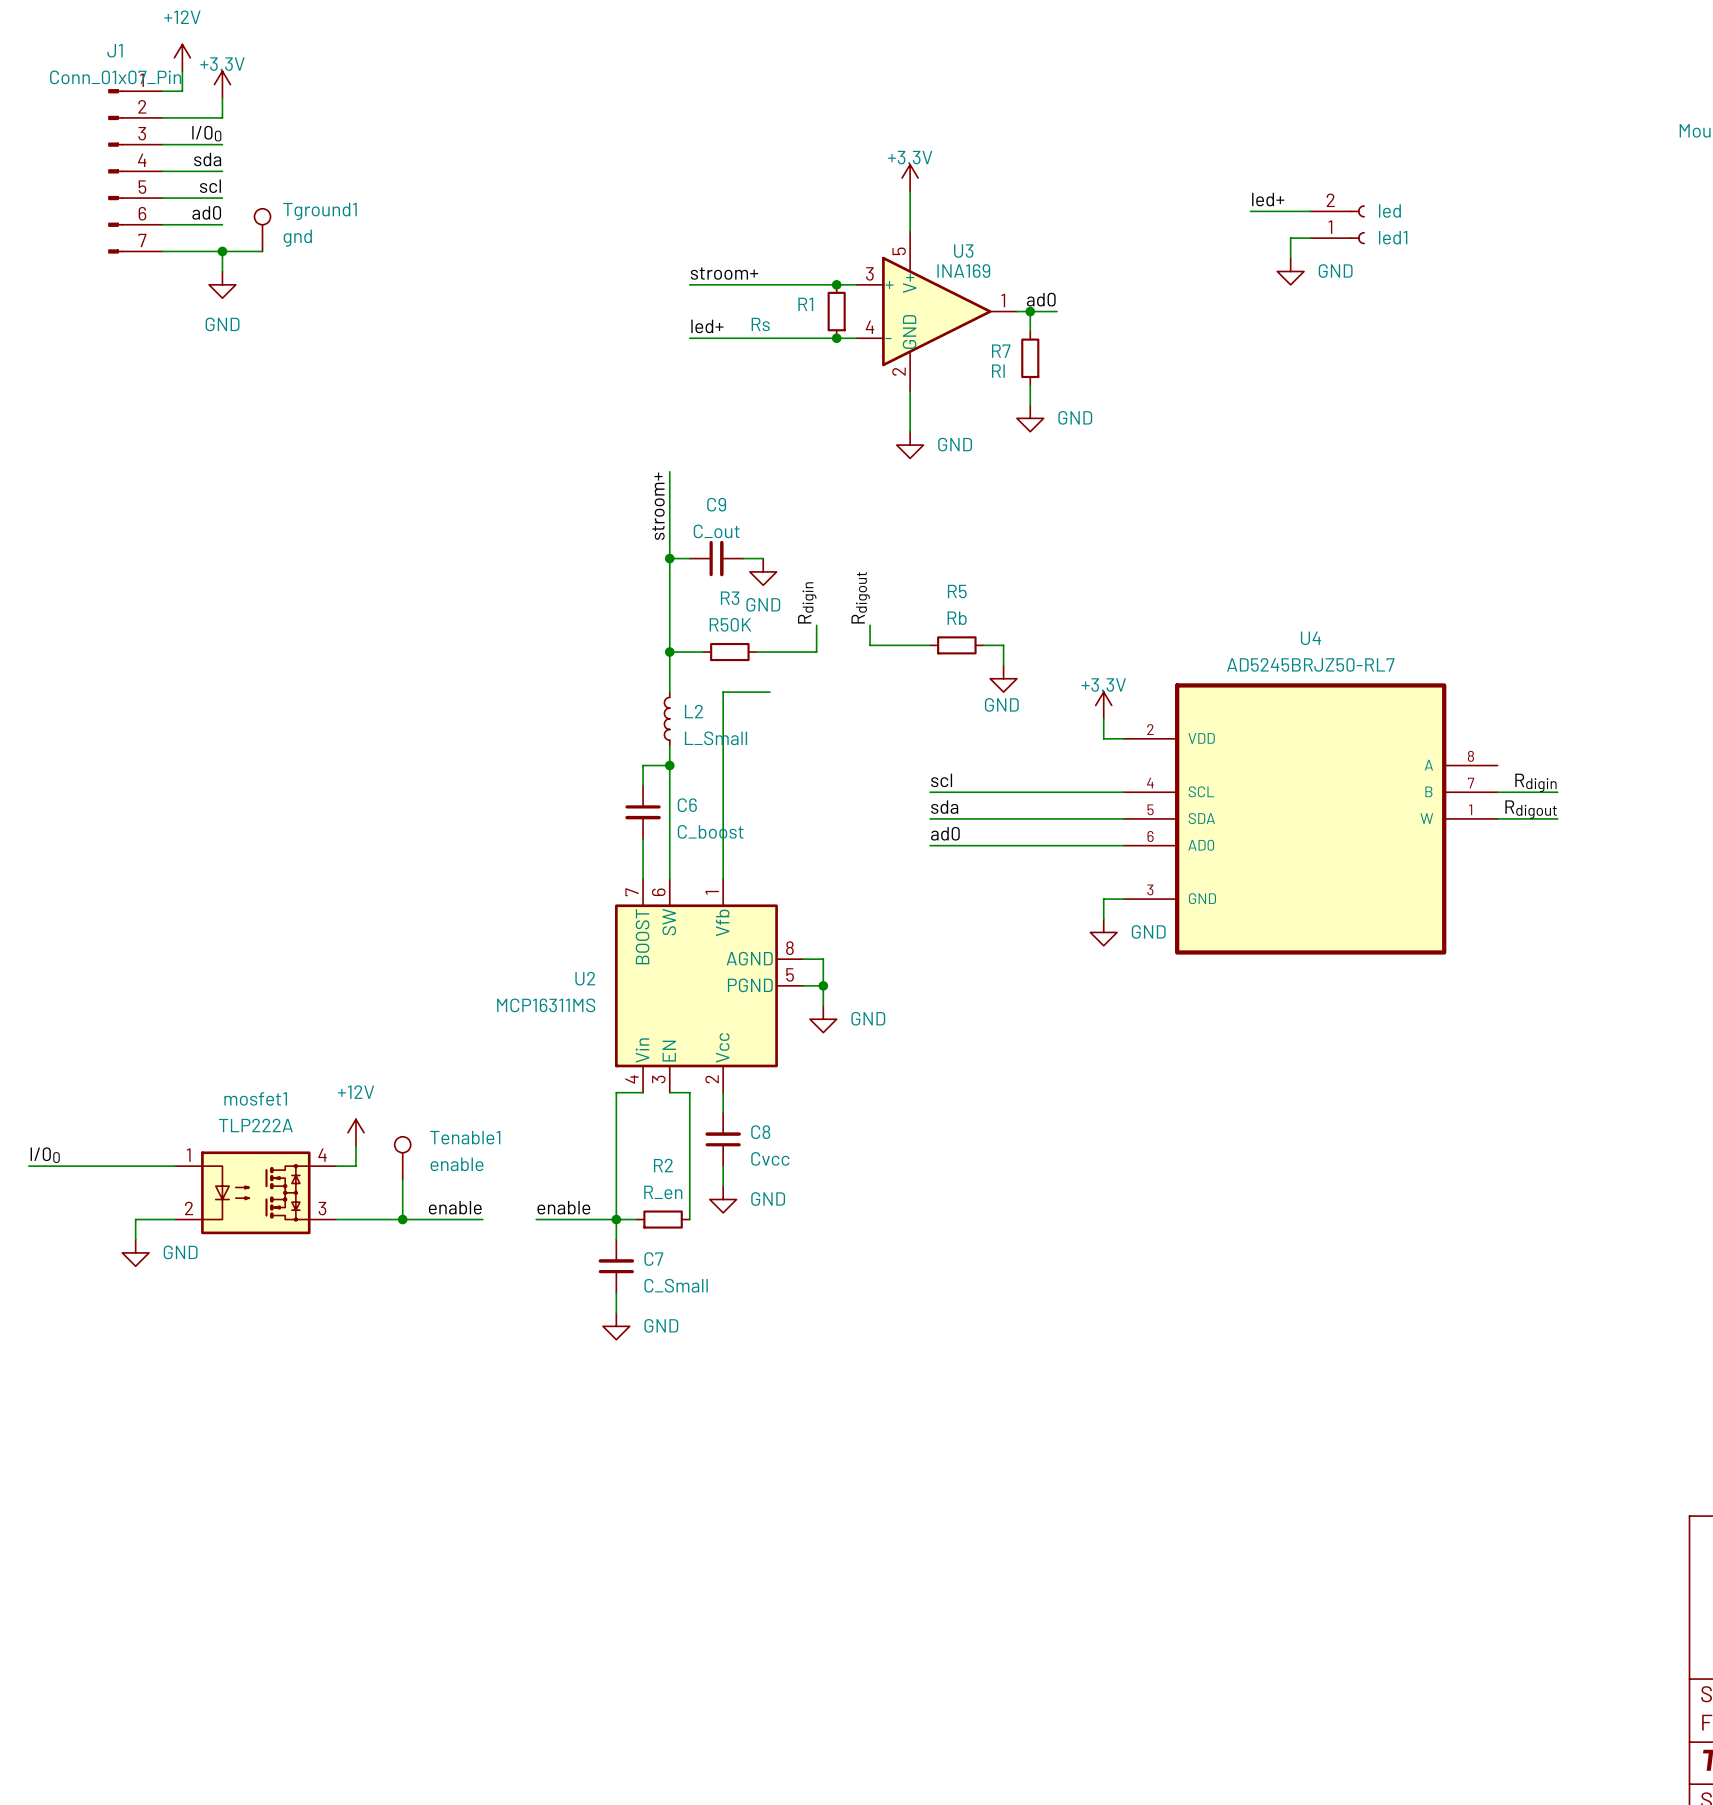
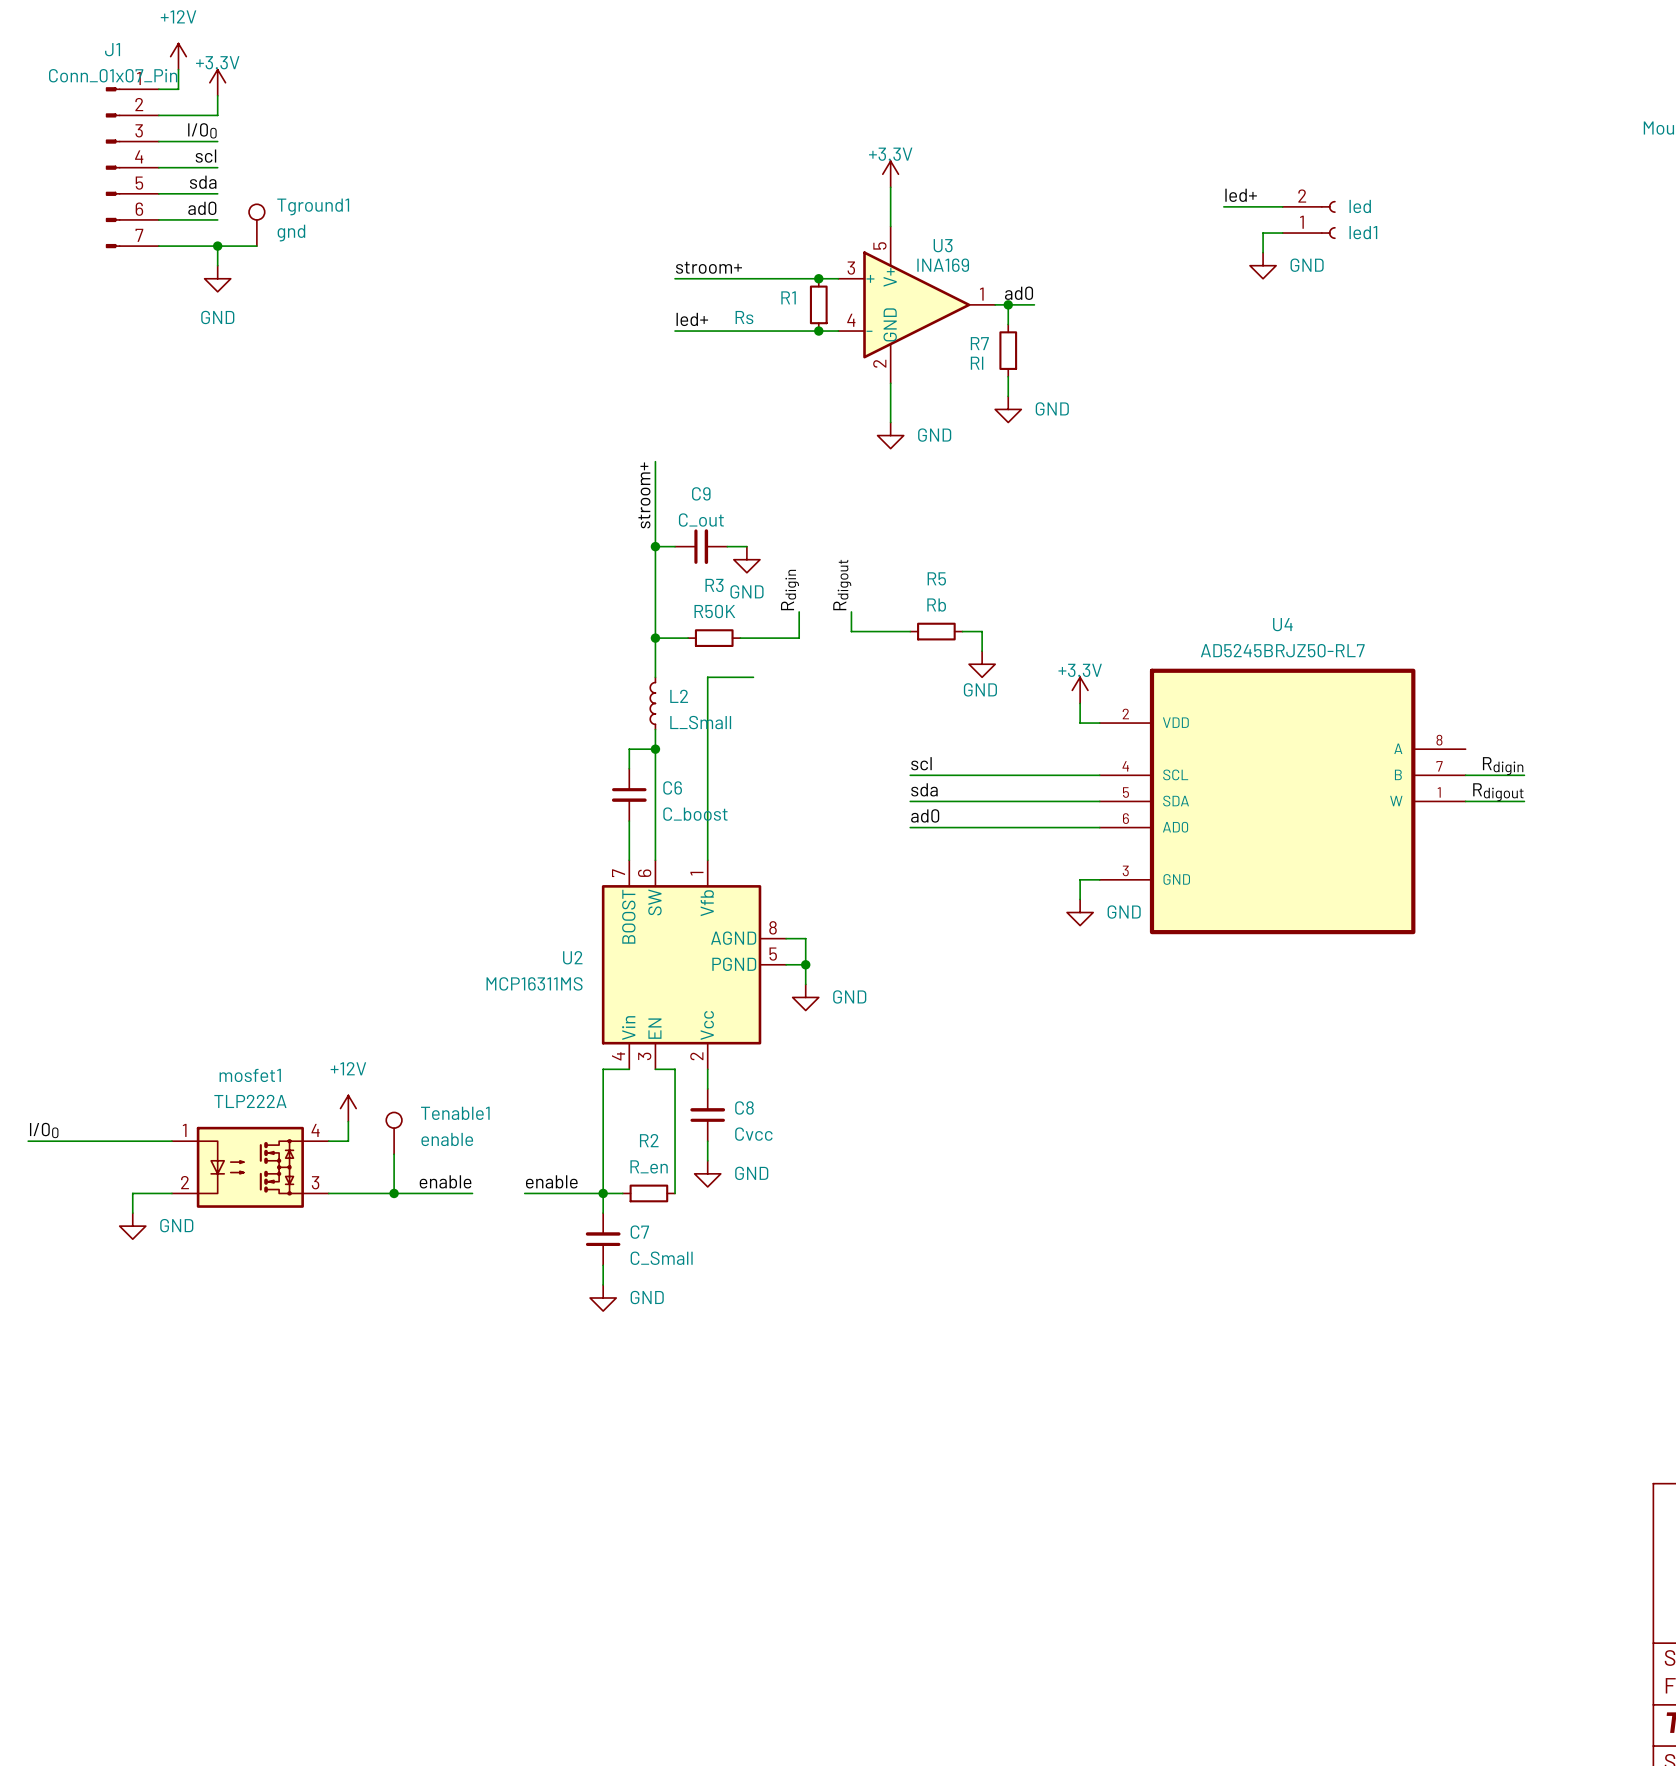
label: sda (207, 159) -> scl (205, 156)
label: scl (210, 186) -> sda (203, 182)

